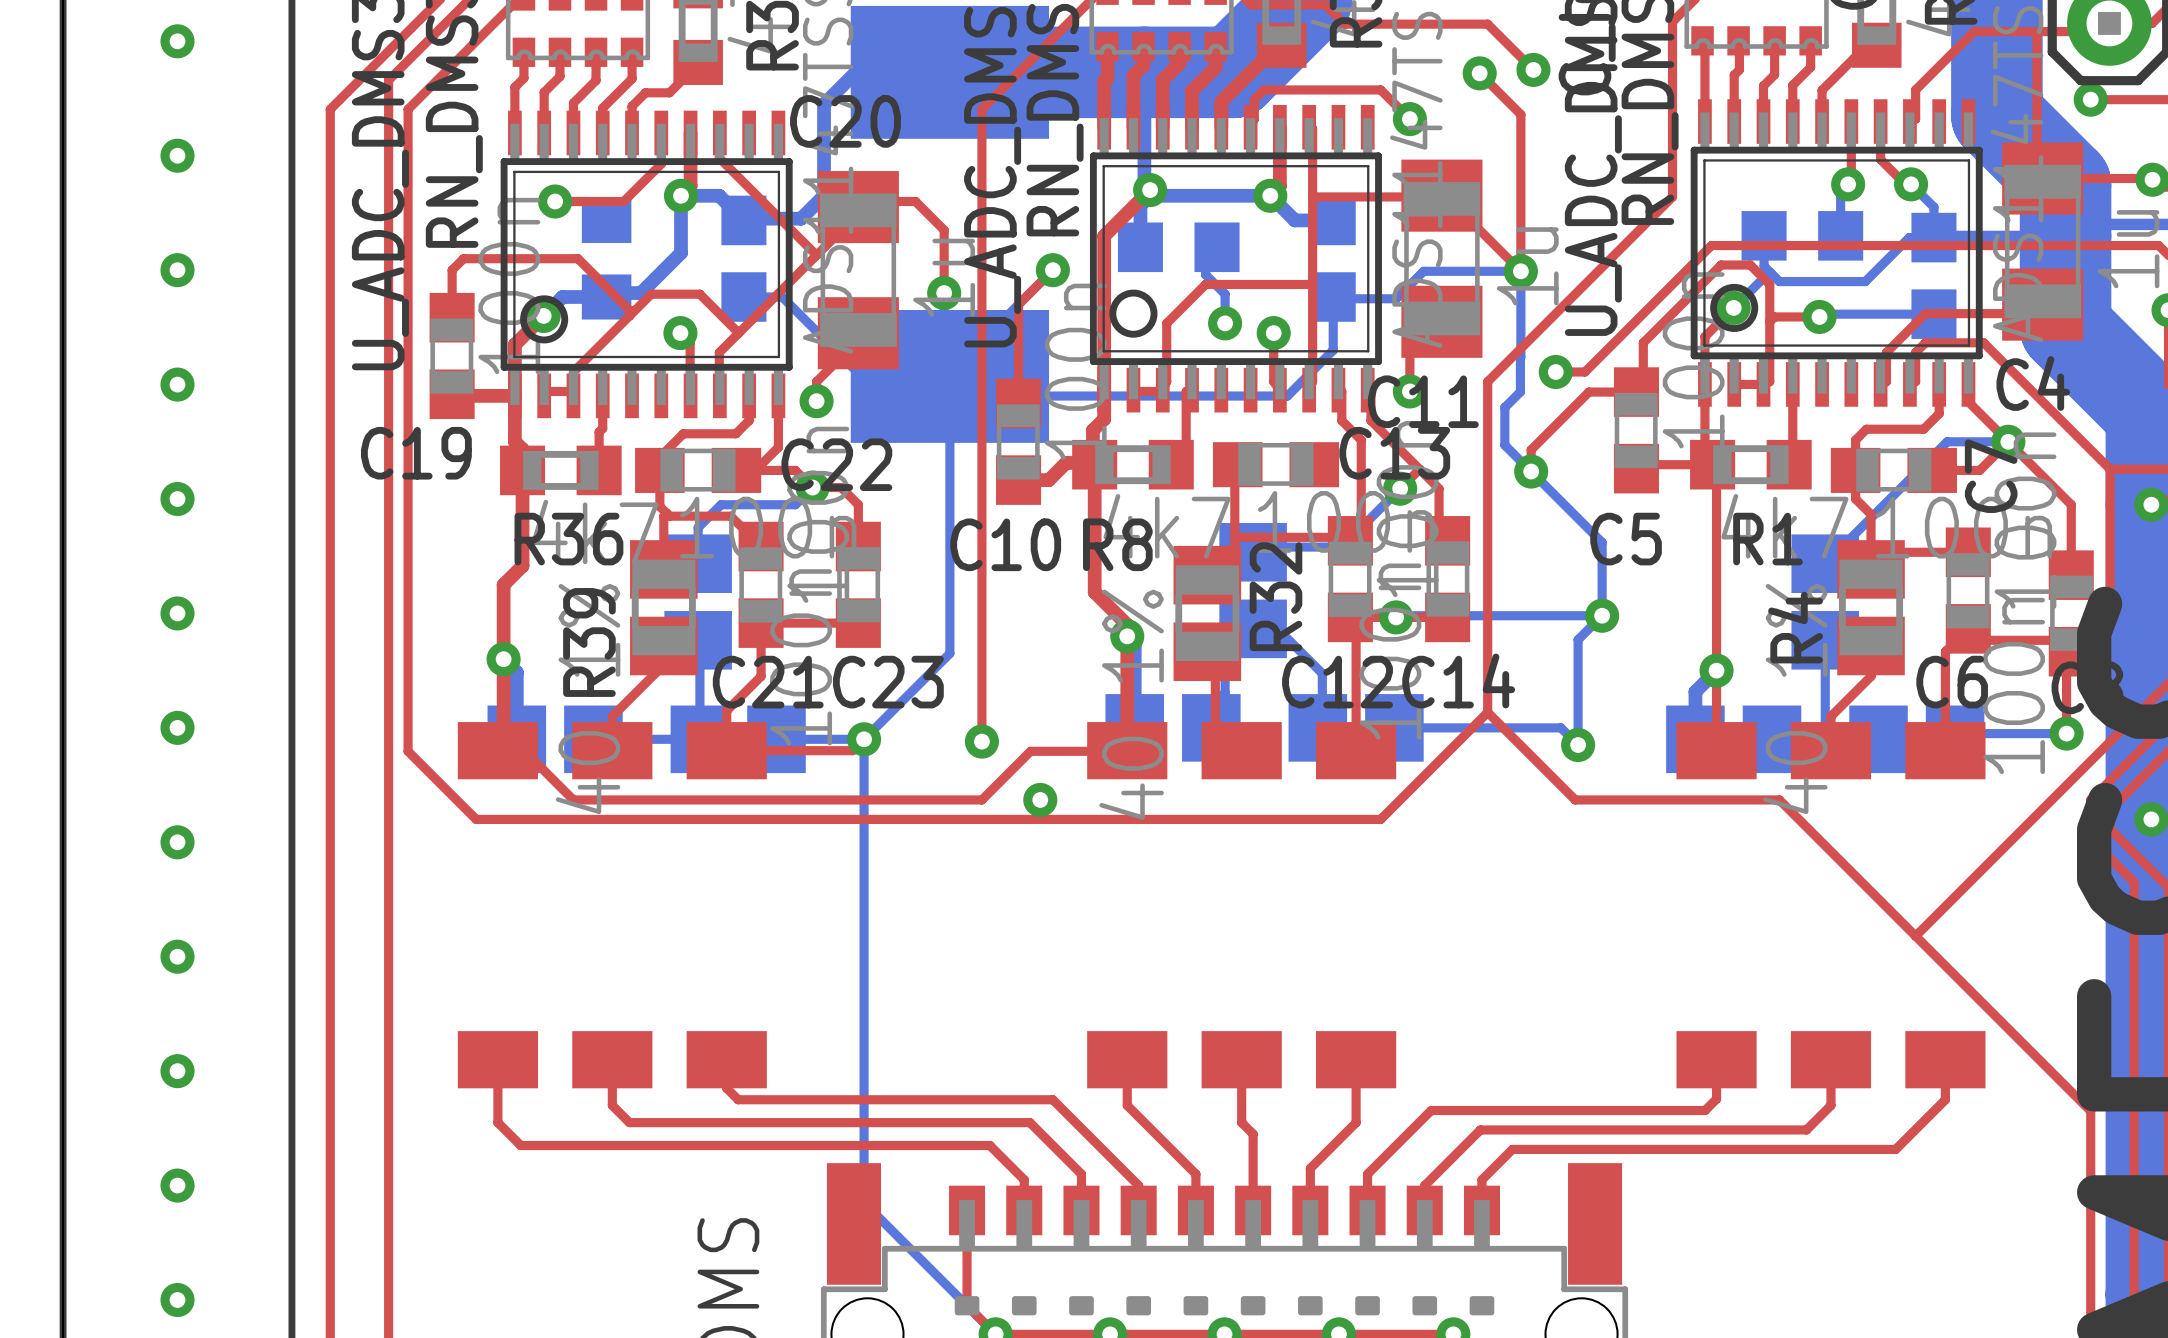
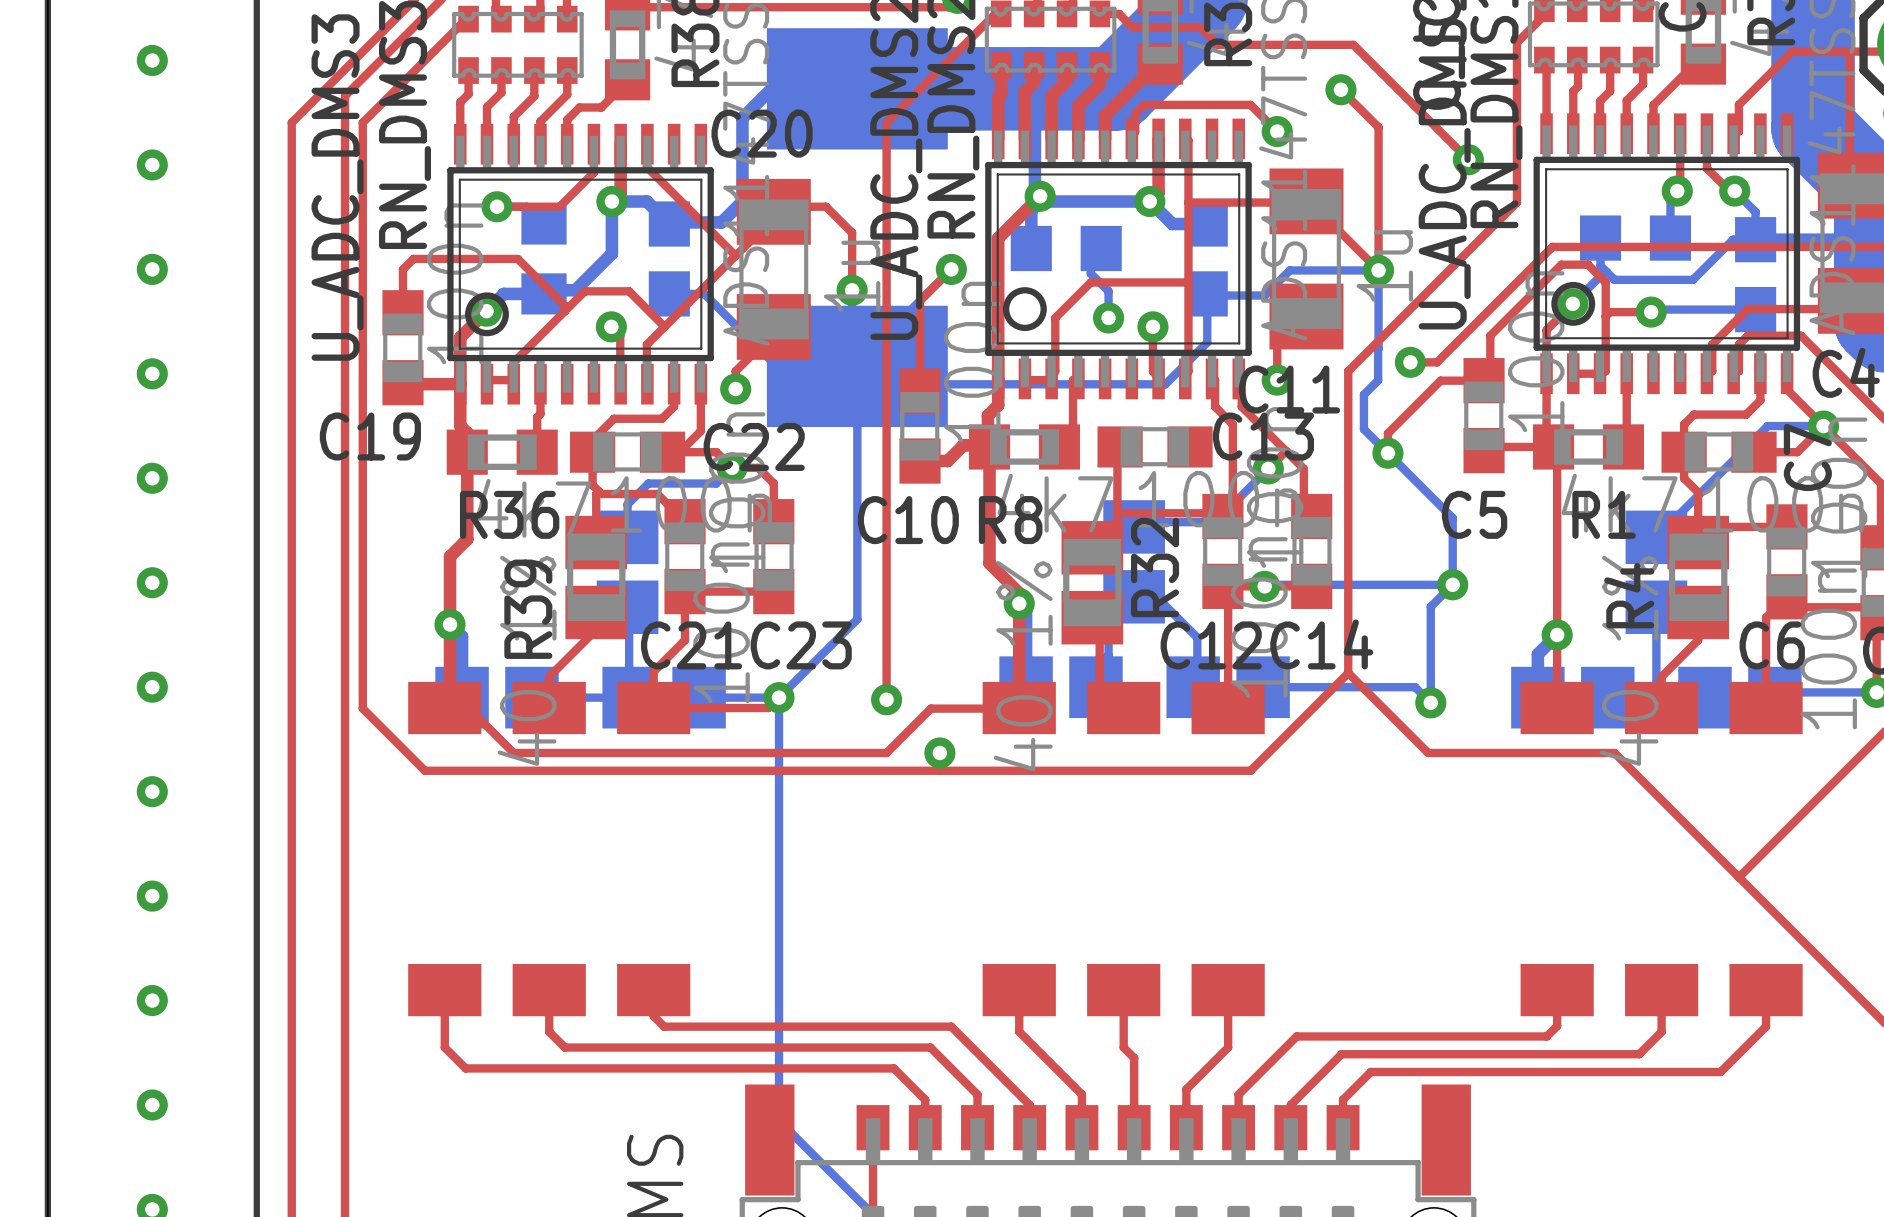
top track: (1487, 24) (1533, 69) -> (1348, 44) (1353, 44) (1468, 159)
via position: (1533, 69) -> (1468, 159)

